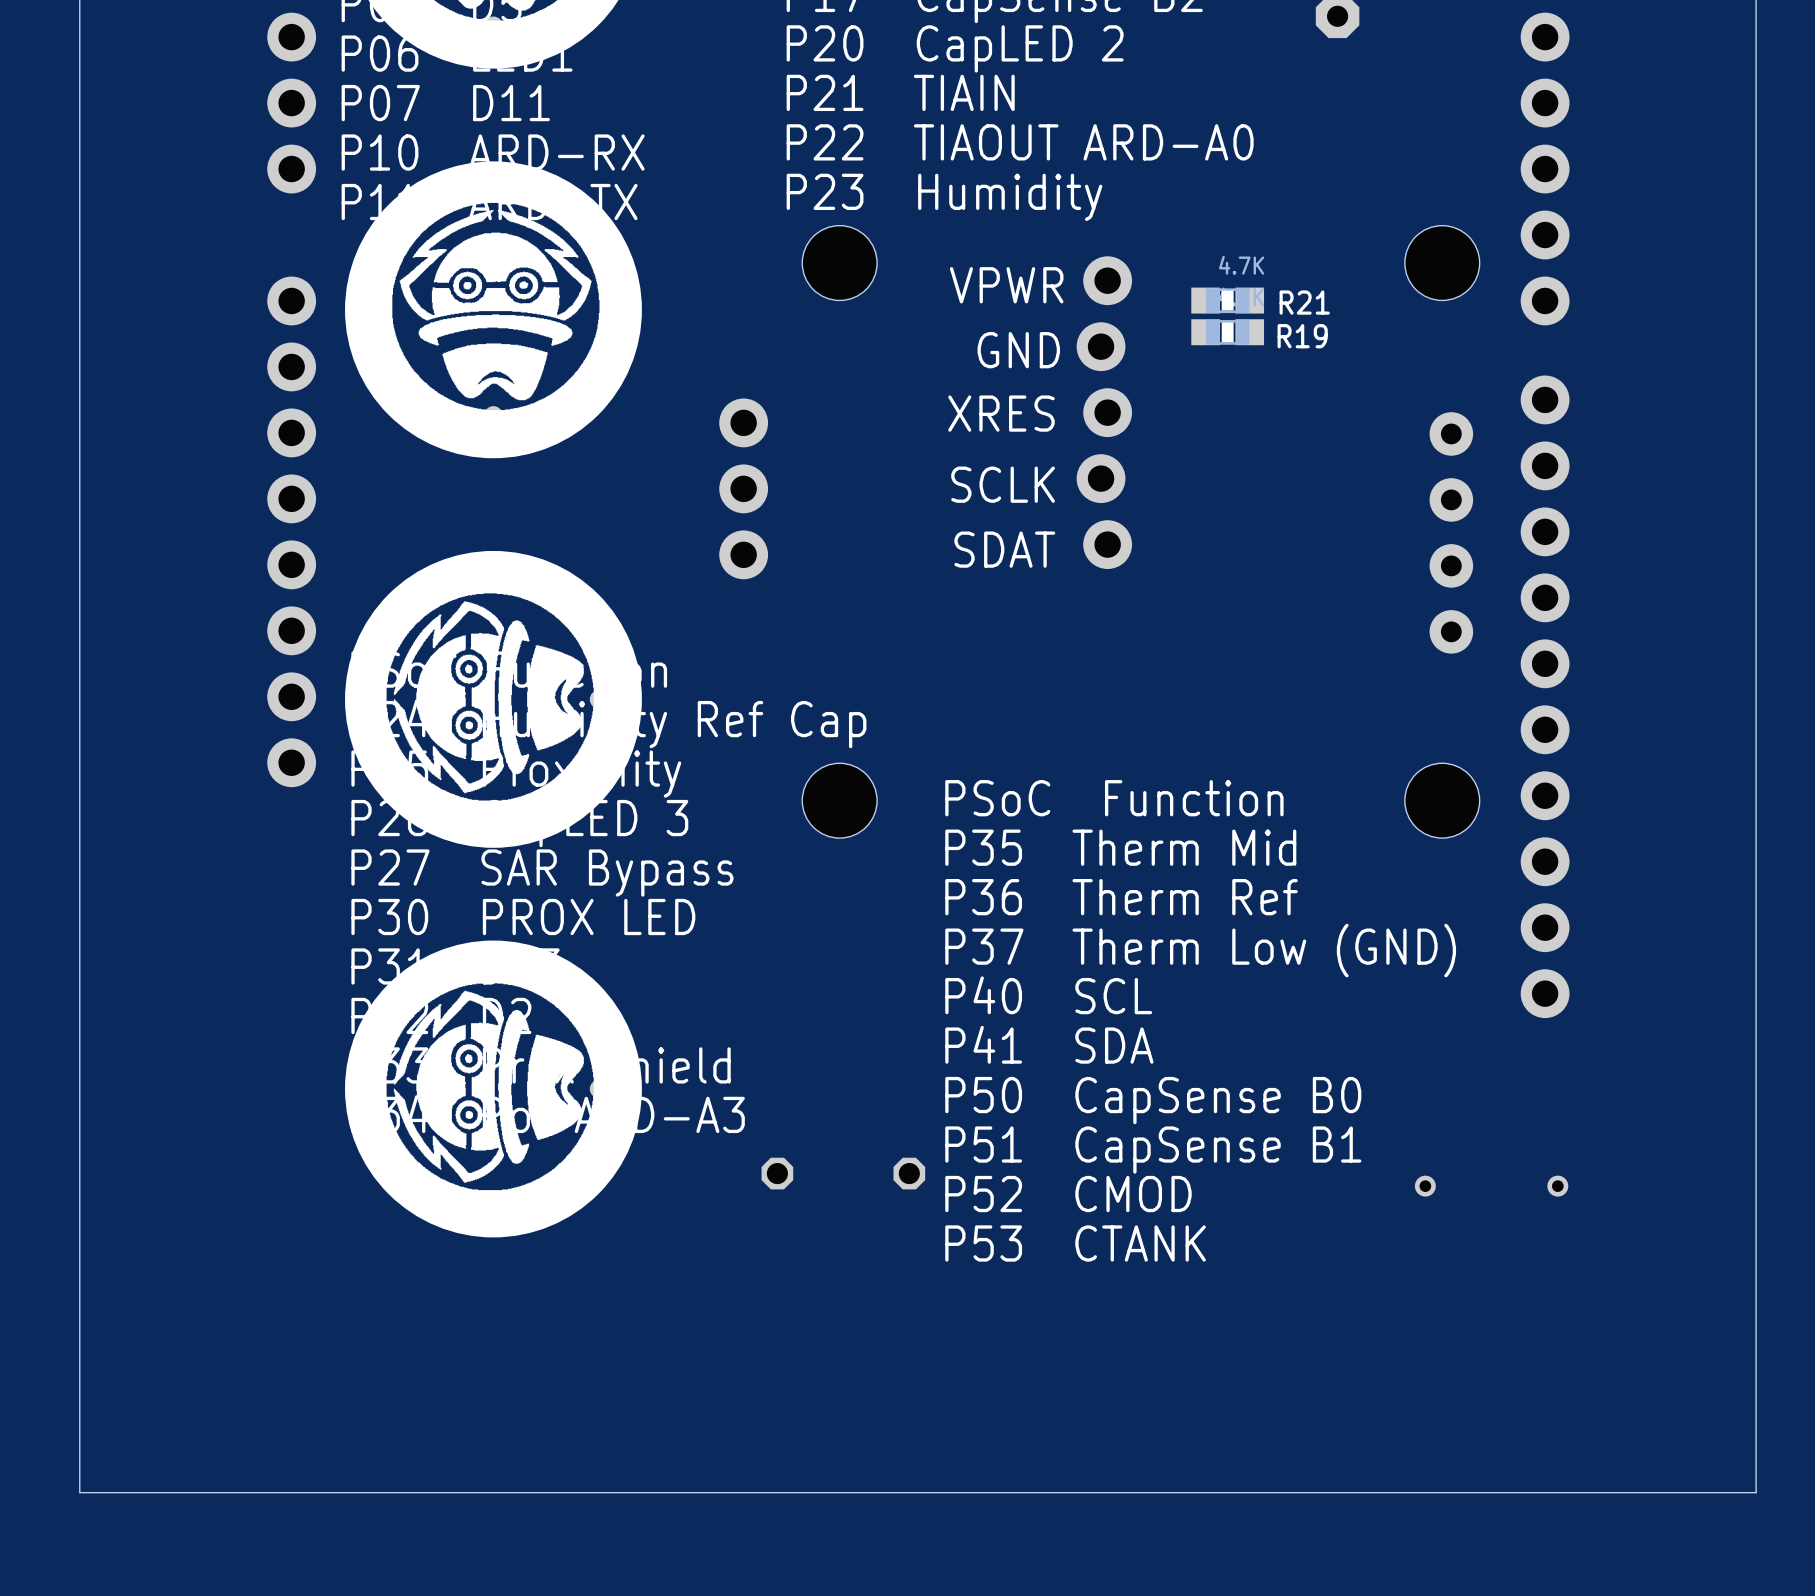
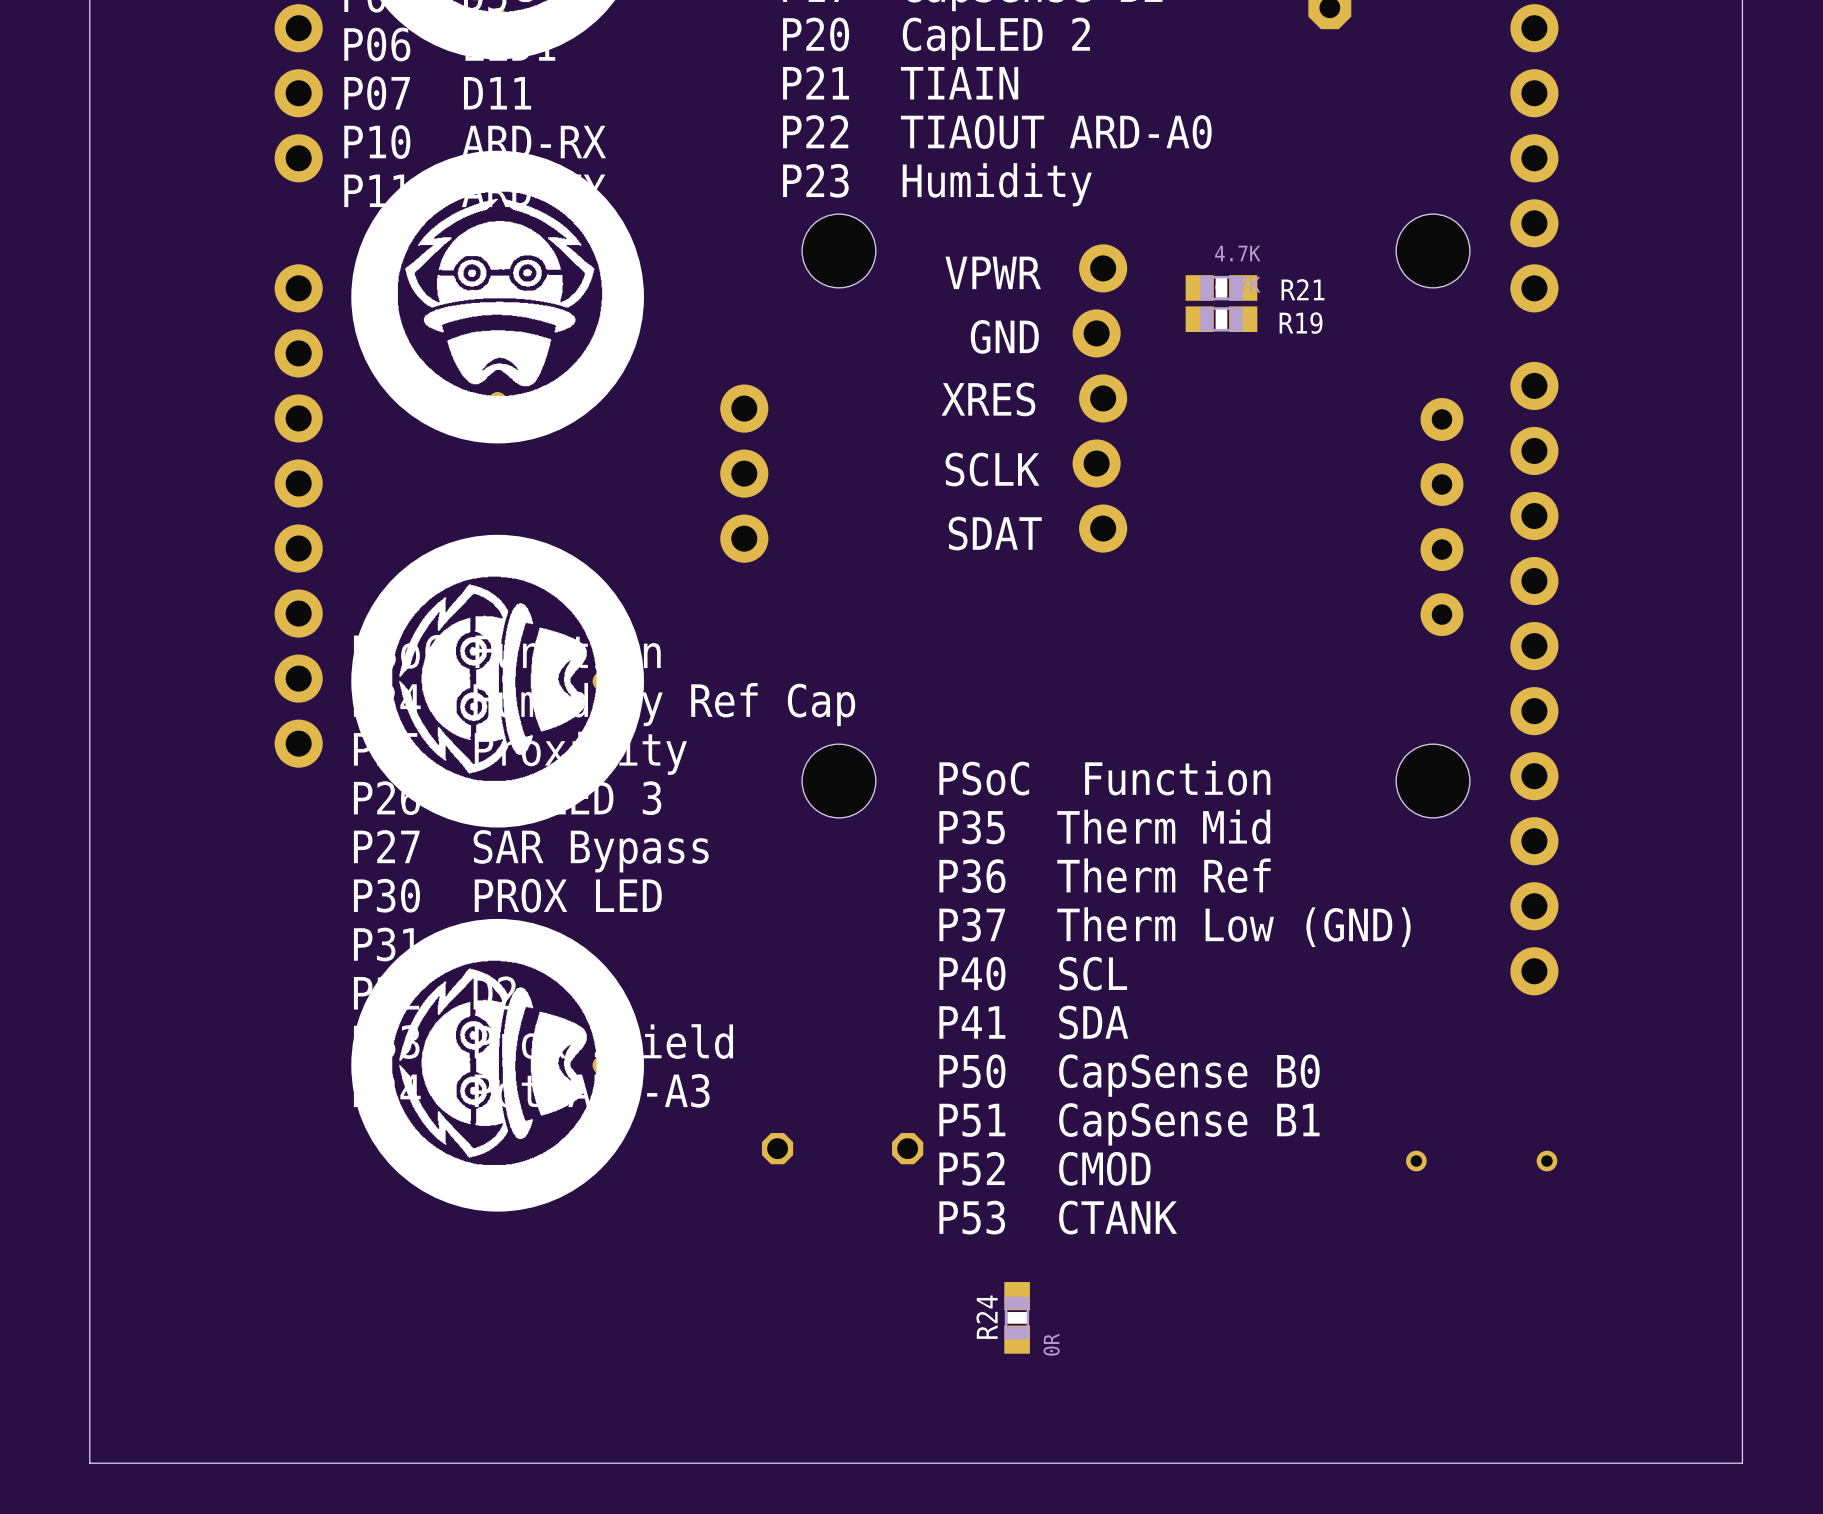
R24: none -> 0R (1017, 1317)

